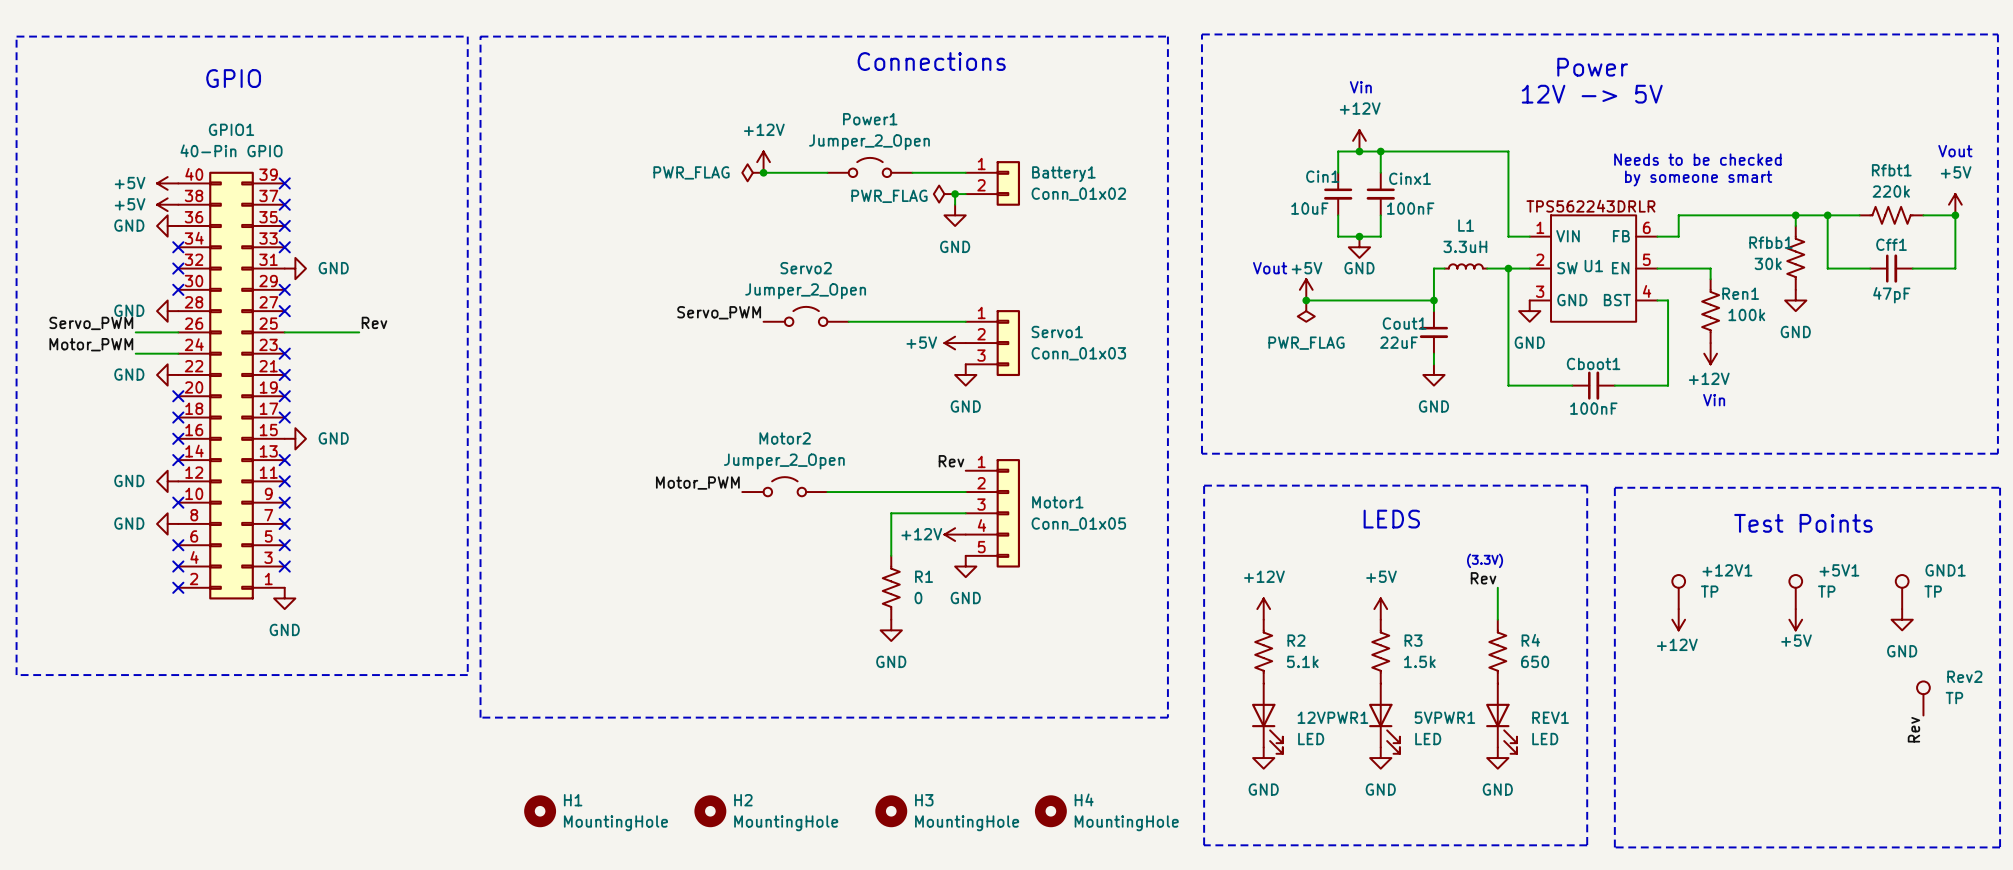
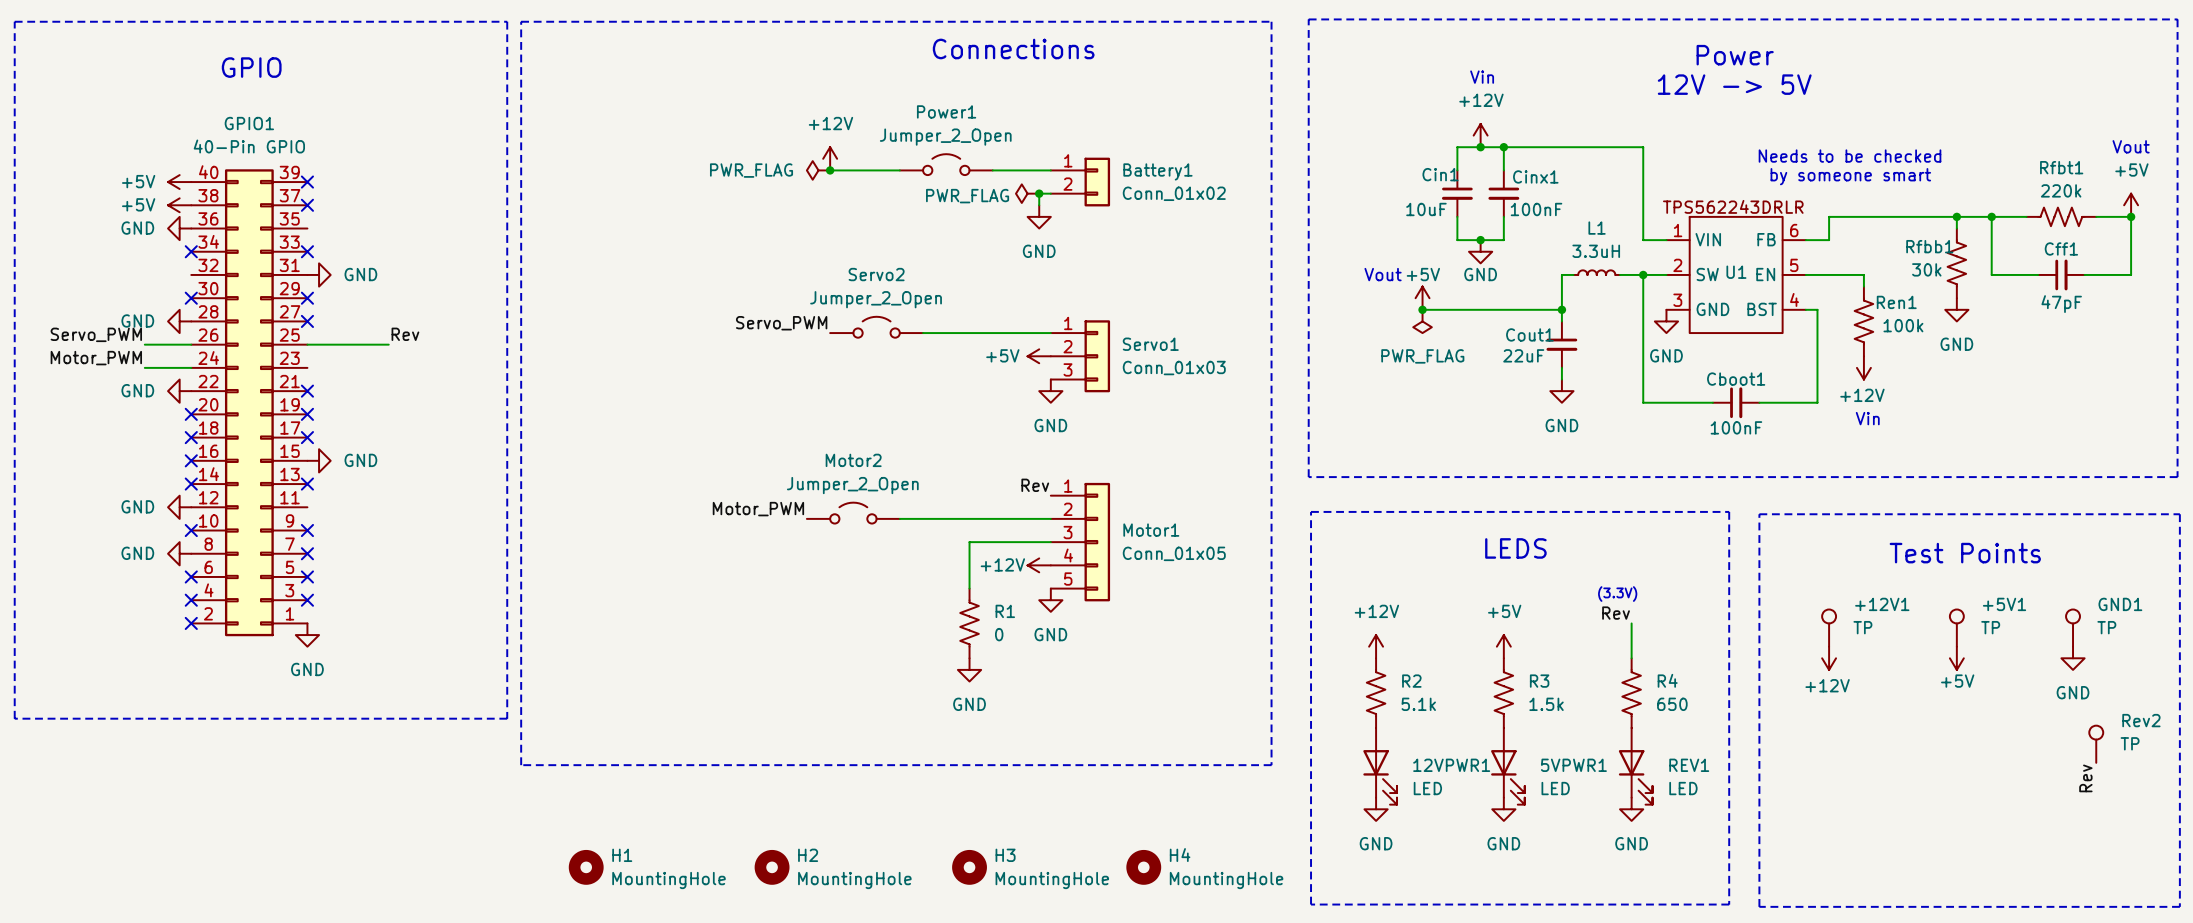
no-connect mark: (284, 225) -> none
no-connect mark: (178, 268) -> none
no-connect mark: (284, 353) -> none
no-connect mark: (284, 481) -> none

